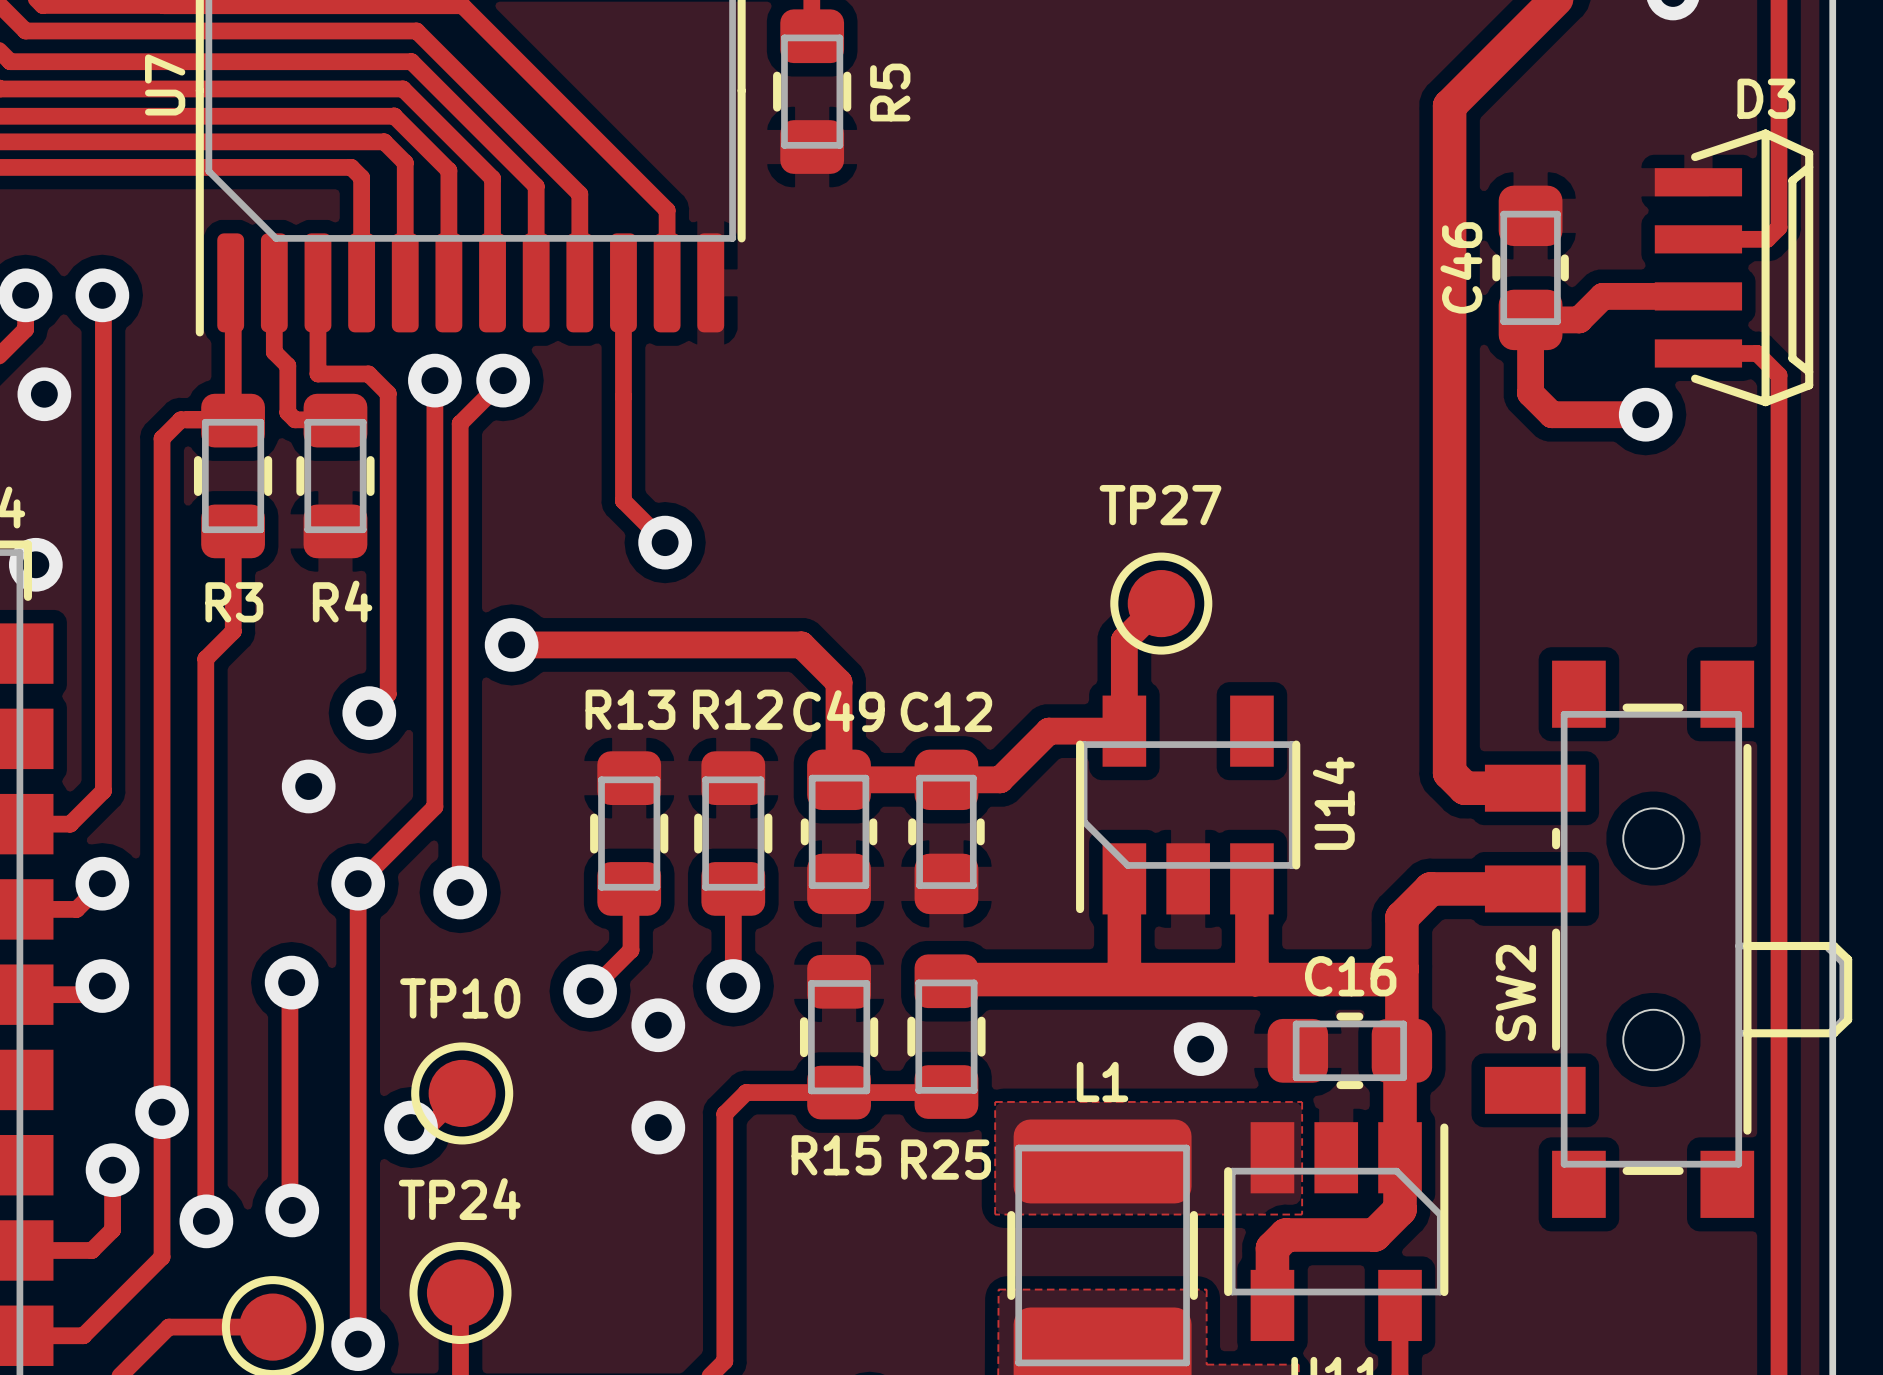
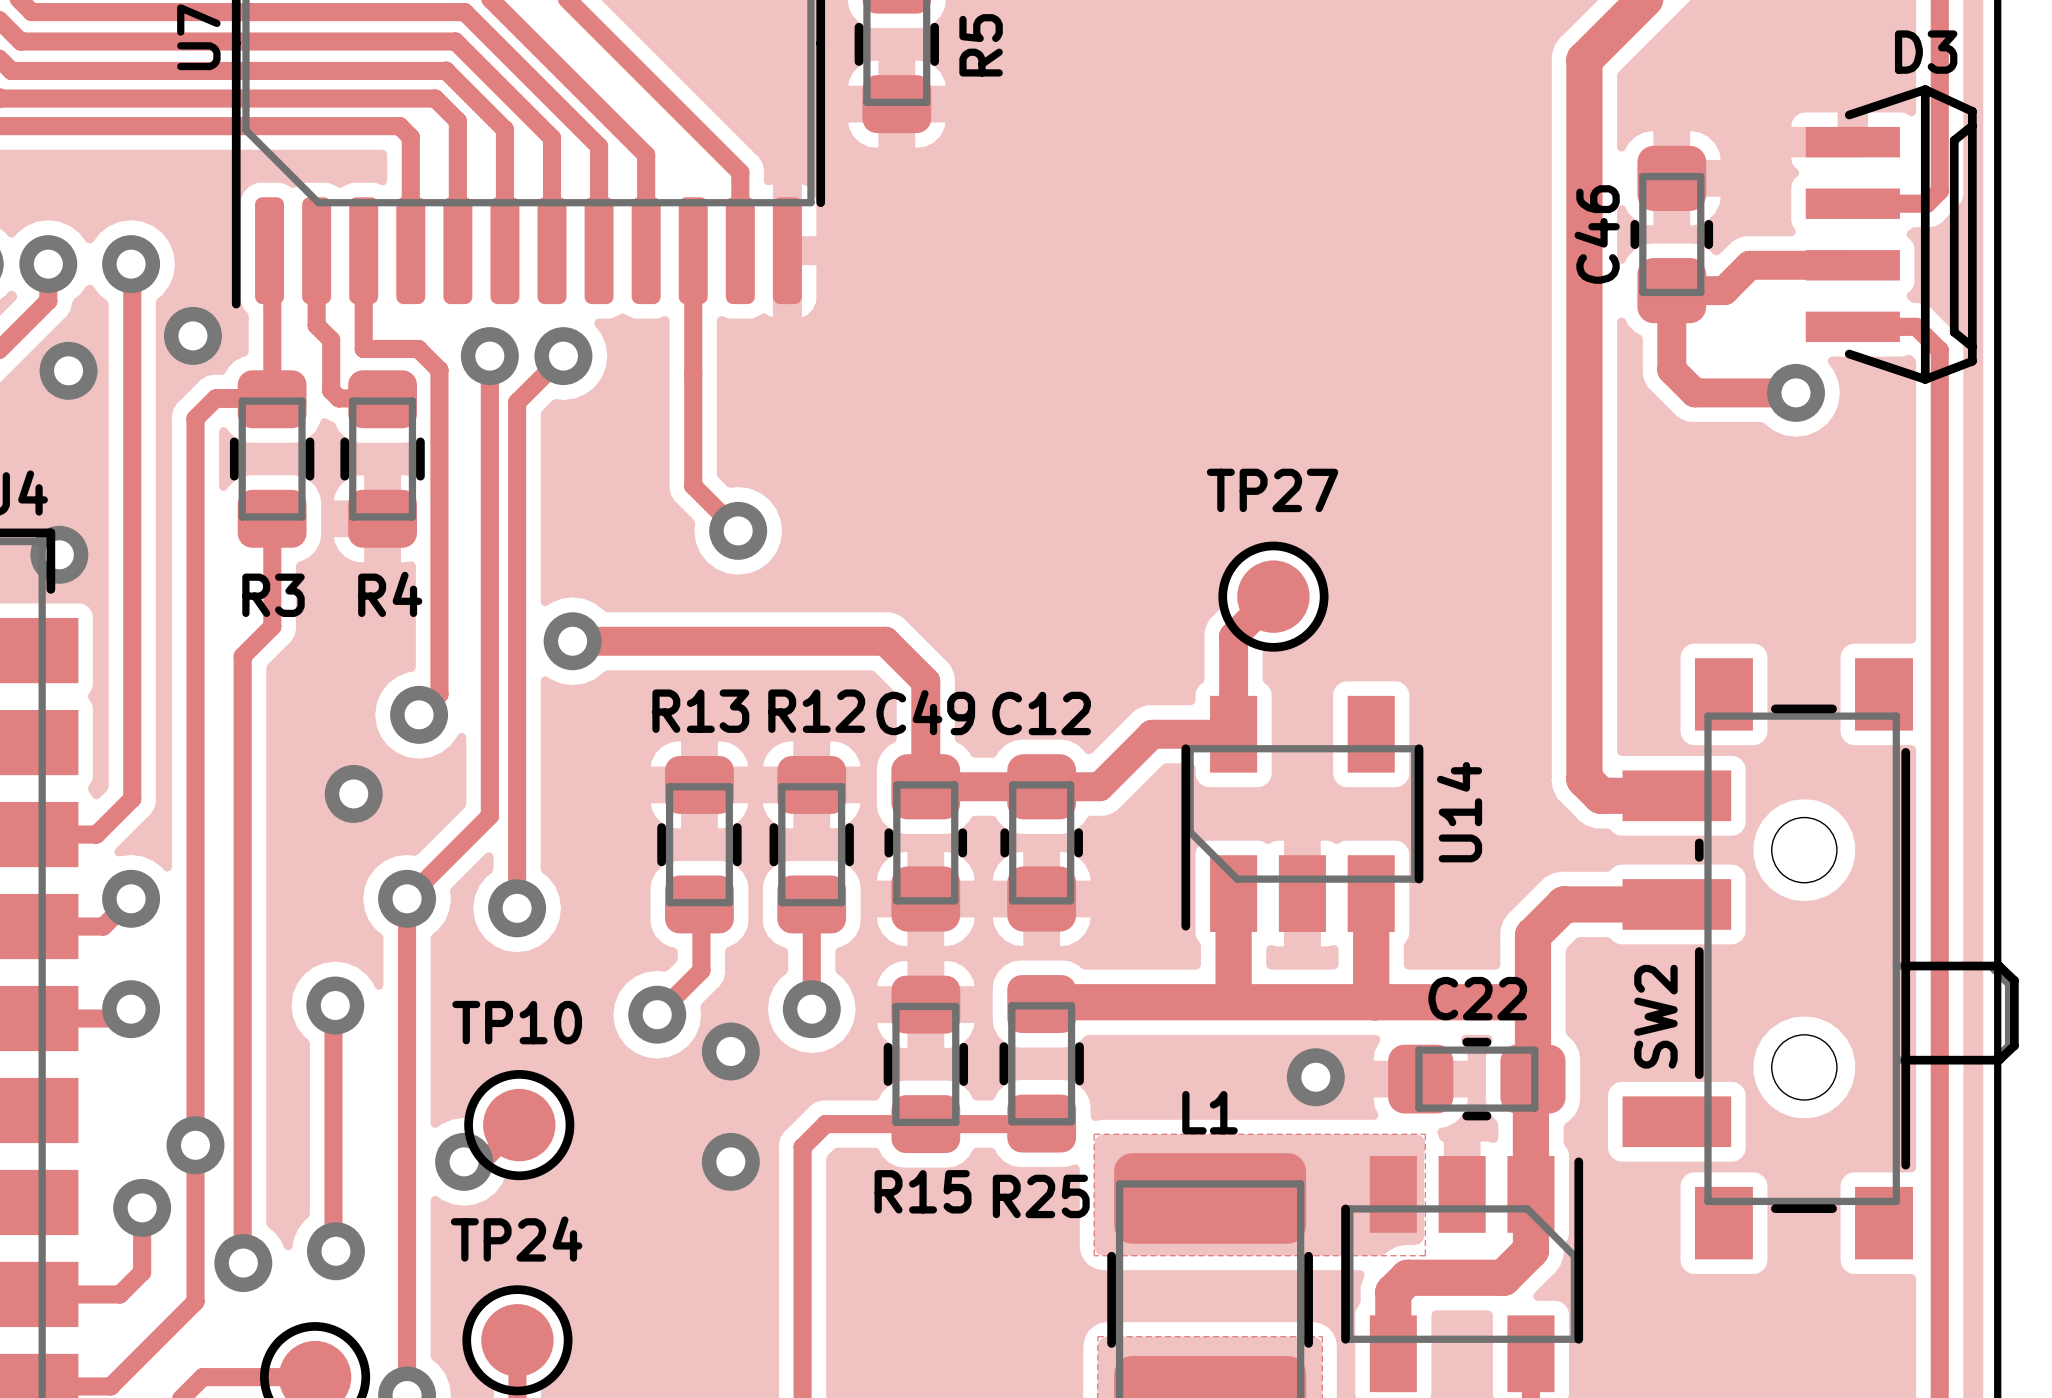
via: none -> (192, 335)
C16 name: C16 (1350, 976) -> C22 (1477, 998)

